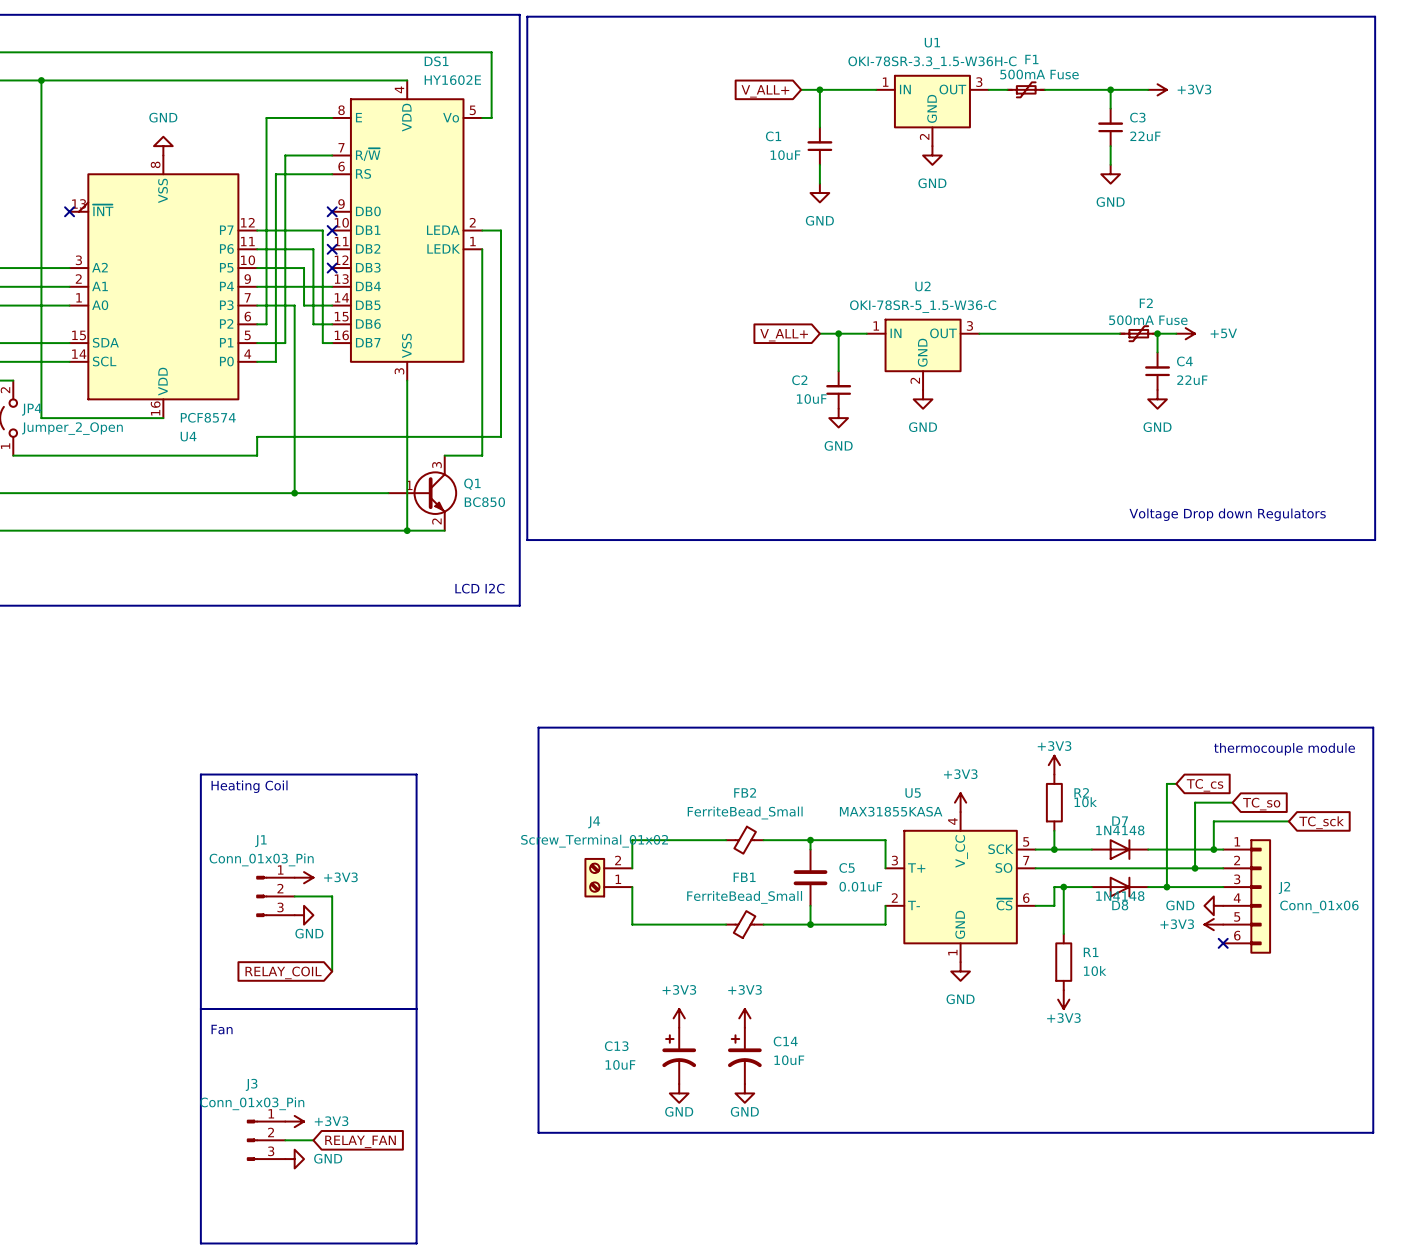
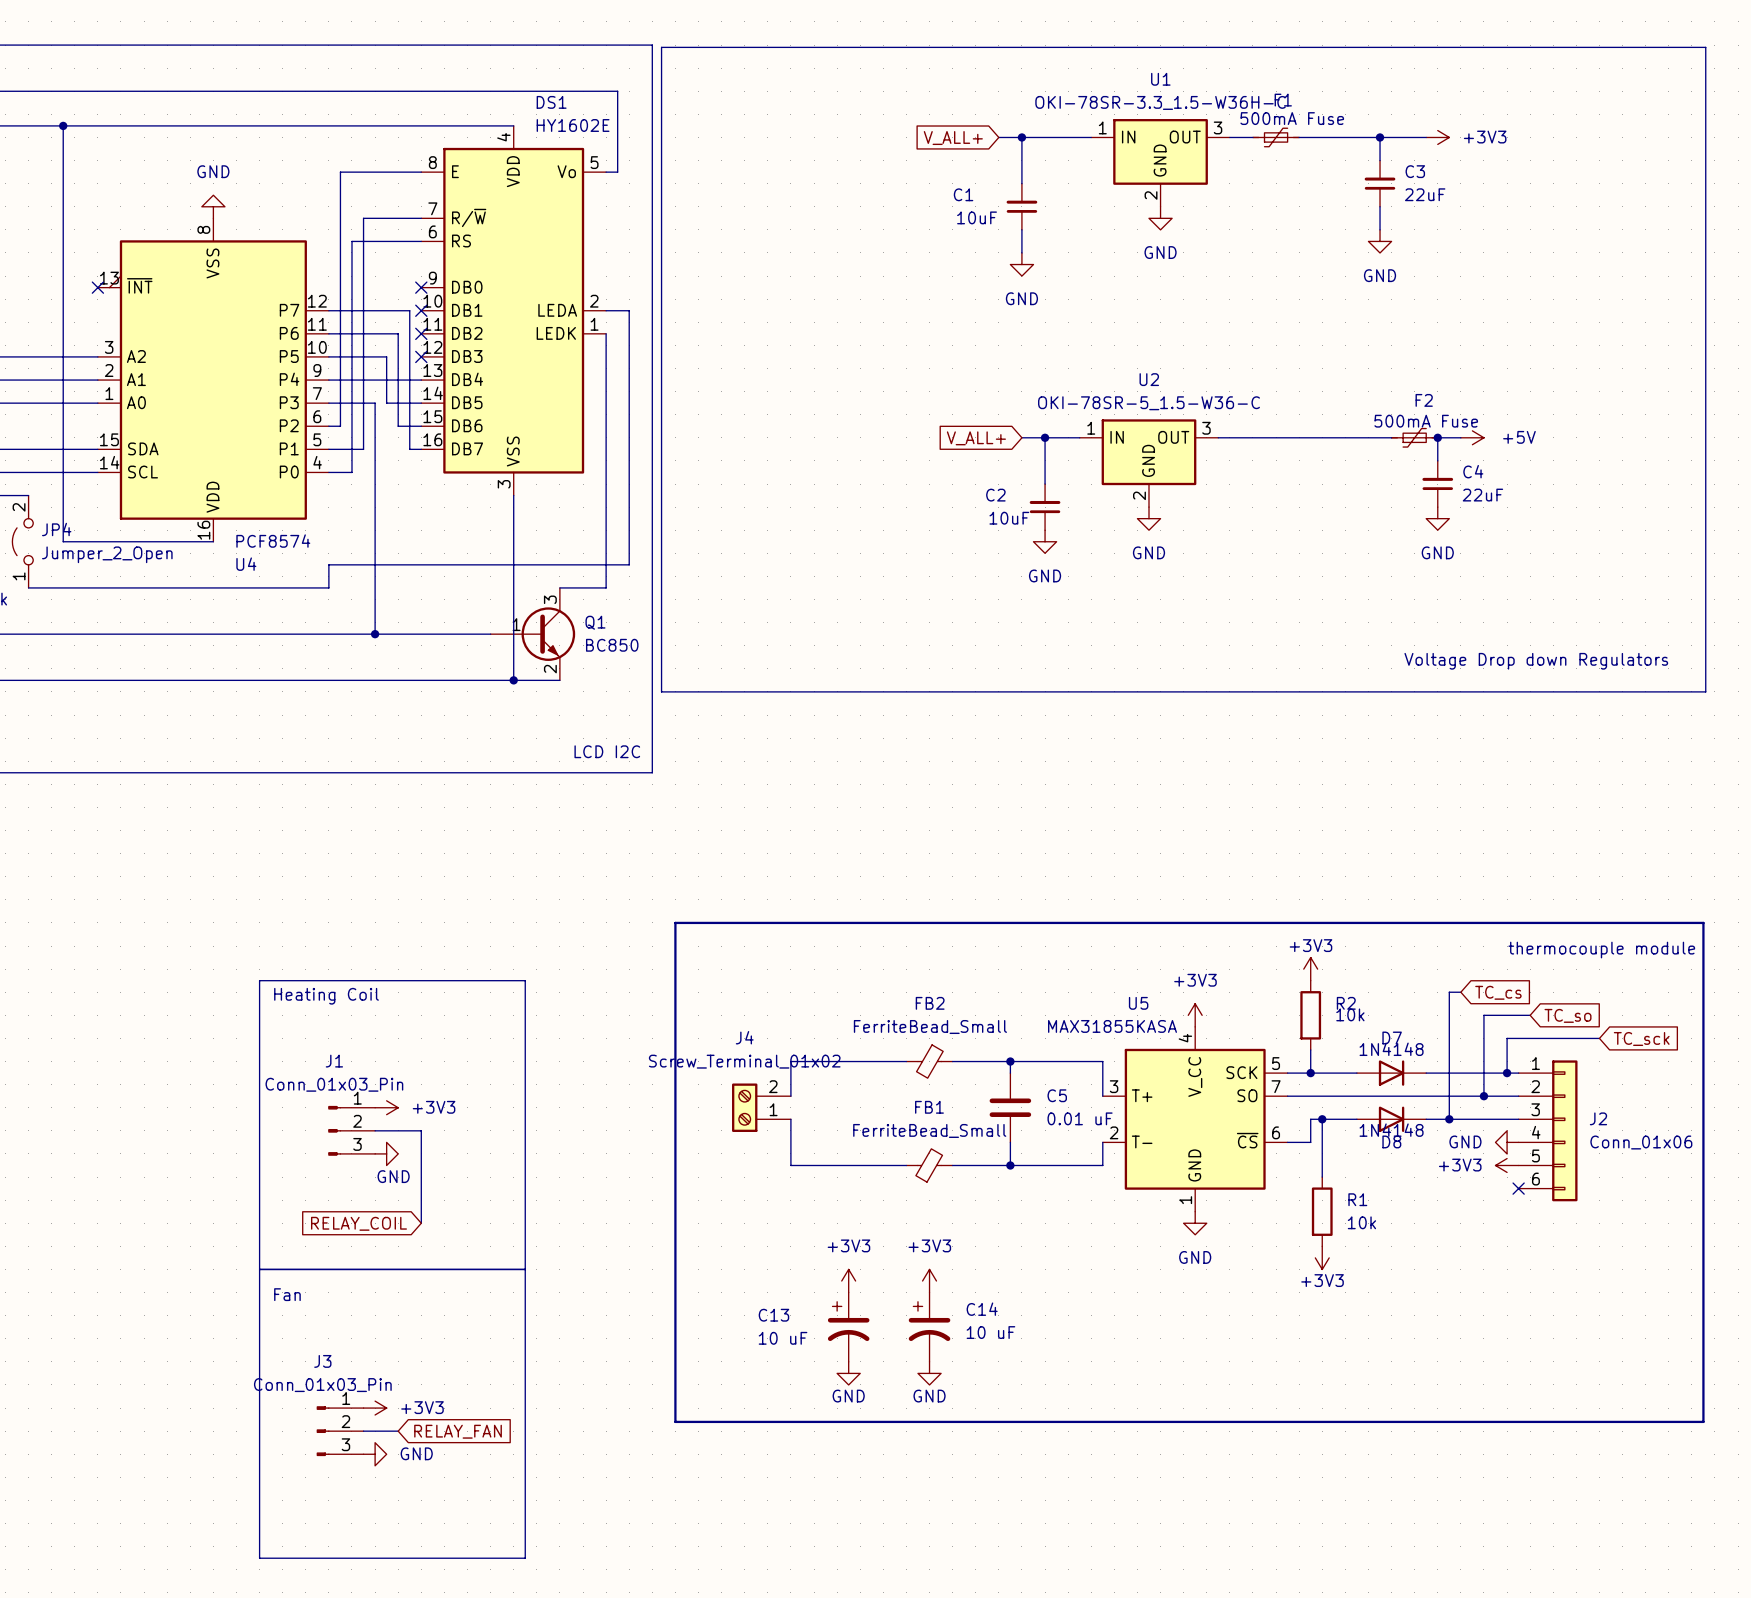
C5 value: 0.01uF (860, 886) -> 0.01 uF (1080, 1118)
C14 value: 10uF (789, 1060) -> 10 uF (990, 1332)
C13 value: 10uF (620, 1064) -> 10 uF (783, 1338)

